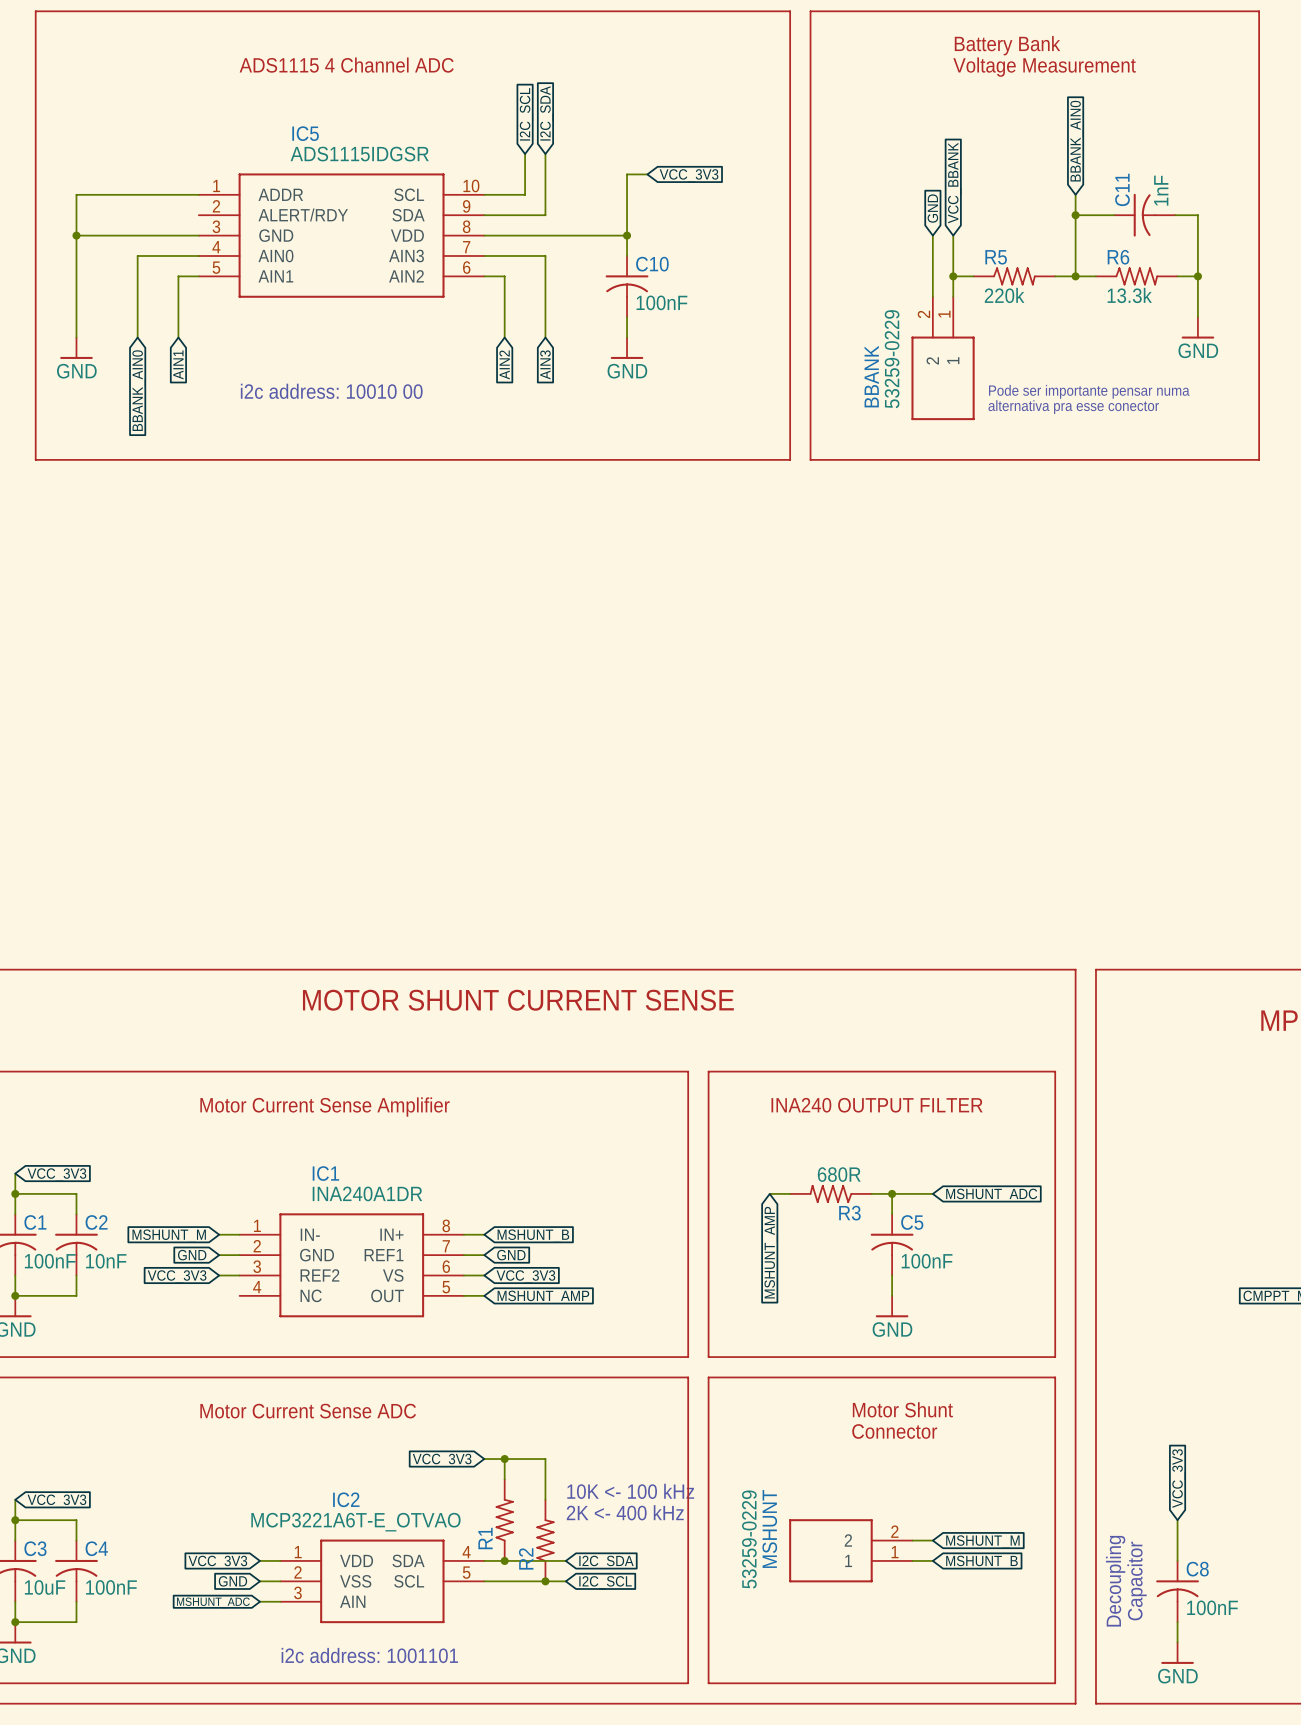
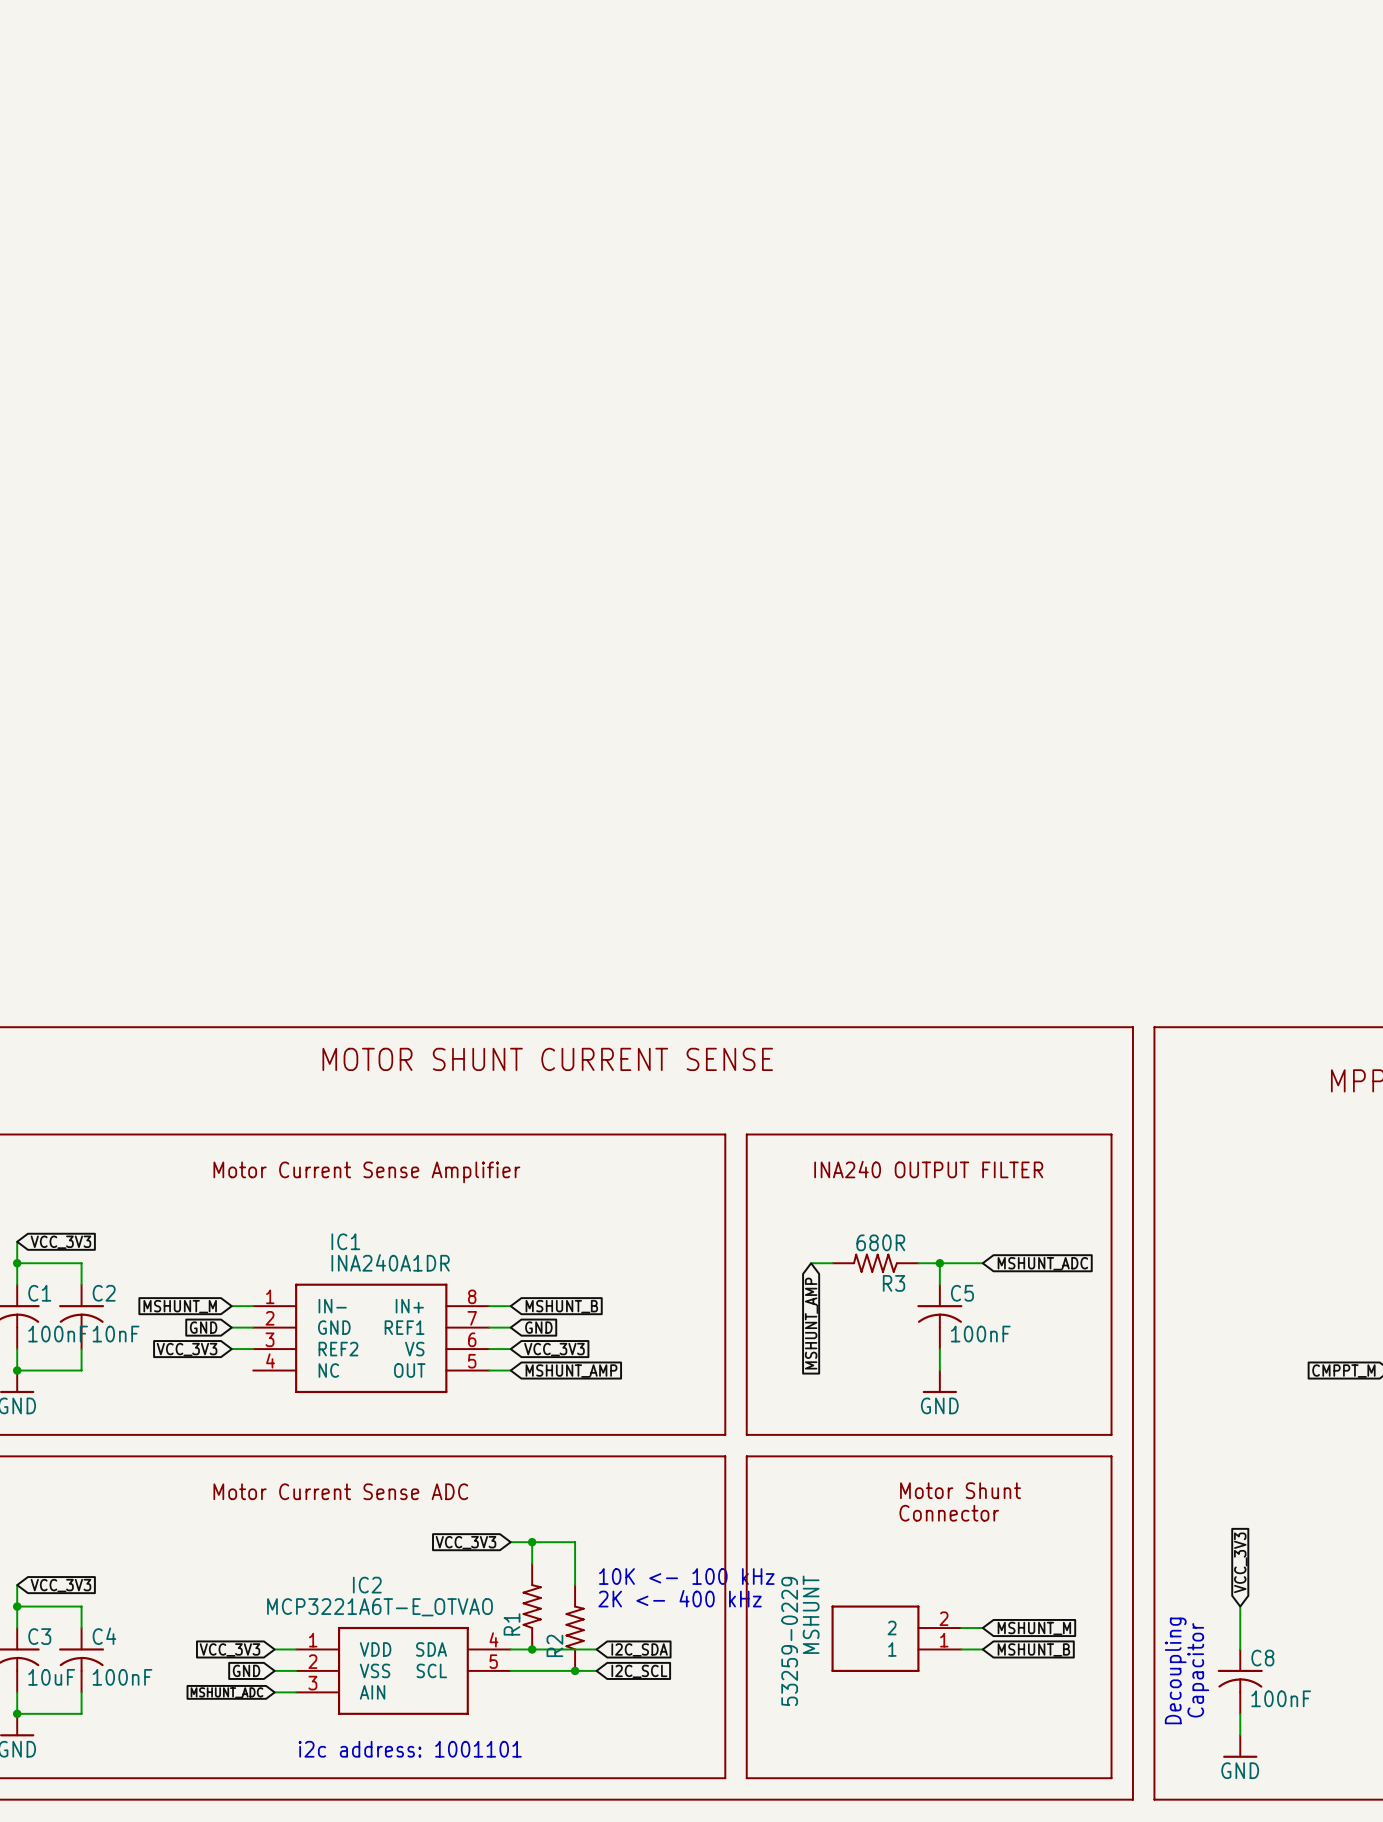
line: (35, 11) (35, 459) (790, 459) (790, 11) (35, 11) -> none
line: (810, 11) (1259, 11) (1259, 459) (810, 459) (810, 11) -> none
text: Battery Bank (1007, 45) -> none
text: ADS1115 4 Channel ADC (346, 65) -> none
text: Voltage Measurement (1044, 67) -> none
global label: I2C_SDA (546, 113) -> none
global label: I2C_SCL (526, 114) -> none
global label: BBANK_AIN0 (1077, 141) -> none
wire: (525, 154) (525, 194) (484, 194) -> none
wire: (545, 154) (545, 215) (484, 215) -> none
wire: (647, 174) (627, 174) (627, 255) -> none
global label: VCC_3V3 (689, 175) -> none
global label: VCC_BBANK (954, 183) -> none
wire: (198, 194) (76, 194) (76, 337) -> none
wire: (1075, 194) (1075, 276) -> none
global label: GND (932, 208) -> none
wire: (1075, 215) (1114, 215) -> none
junction: (1075, 215) -> none
C11: 1nF (1144, 215) -> none
wire: (1175, 215) (1197, 215) (1197, 317) -> none
wire: (76, 235) (198, 235) -> none
junction: (76, 235) -> none
IC5: ADS1115IDGSR (341, 235) -> none
wire: (484, 235) (627, 235) -> none
junction: (627, 235) -> none
wire: (932, 235) (932, 296) -> none
wire: (953, 235) (953, 296) -> none
wire: (198, 255) (137, 255) (137, 337) -> none
wire: (484, 255) (545, 255) (545, 337) -> none
wire: (198, 276) (178, 276) (178, 337) -> none
wire: (484, 276) (504, 276) (504, 337) -> none
wire: (953, 276) (973, 276) -> none
junction: (953, 276) -> none
R5: 220k (1014, 276) -> none
wire: (1055, 276) (1095, 276) -> none
junction: (1075, 276) -> none
R6: 13.3k (1136, 276) -> none
wire: (1177, 276) (1197, 276) -> none
junction: (1197, 276) -> none
C10: 100nF (627, 286) -> none
wire: (627, 317) (627, 337) -> none
power symbol: GND (1197, 327) -> none
power symbol: GND (76, 348) -> none
power symbol: GND (627, 348) -> none
BBANK: 53259-0229 (943, 358) -> none
global label: AIN1 (178, 364) -> none
global label: AIN2 (504, 364) -> none
global label: AIN3 (545, 364) -> none
global label: BBANK_AIN0 (139, 390) -> none
text: i2c address: 10010 00 (331, 391) -> none
text: Pode ser importante pensar numa (1089, 391) -> none
text: alternativa pra esse conector (1073, 407) -> none

